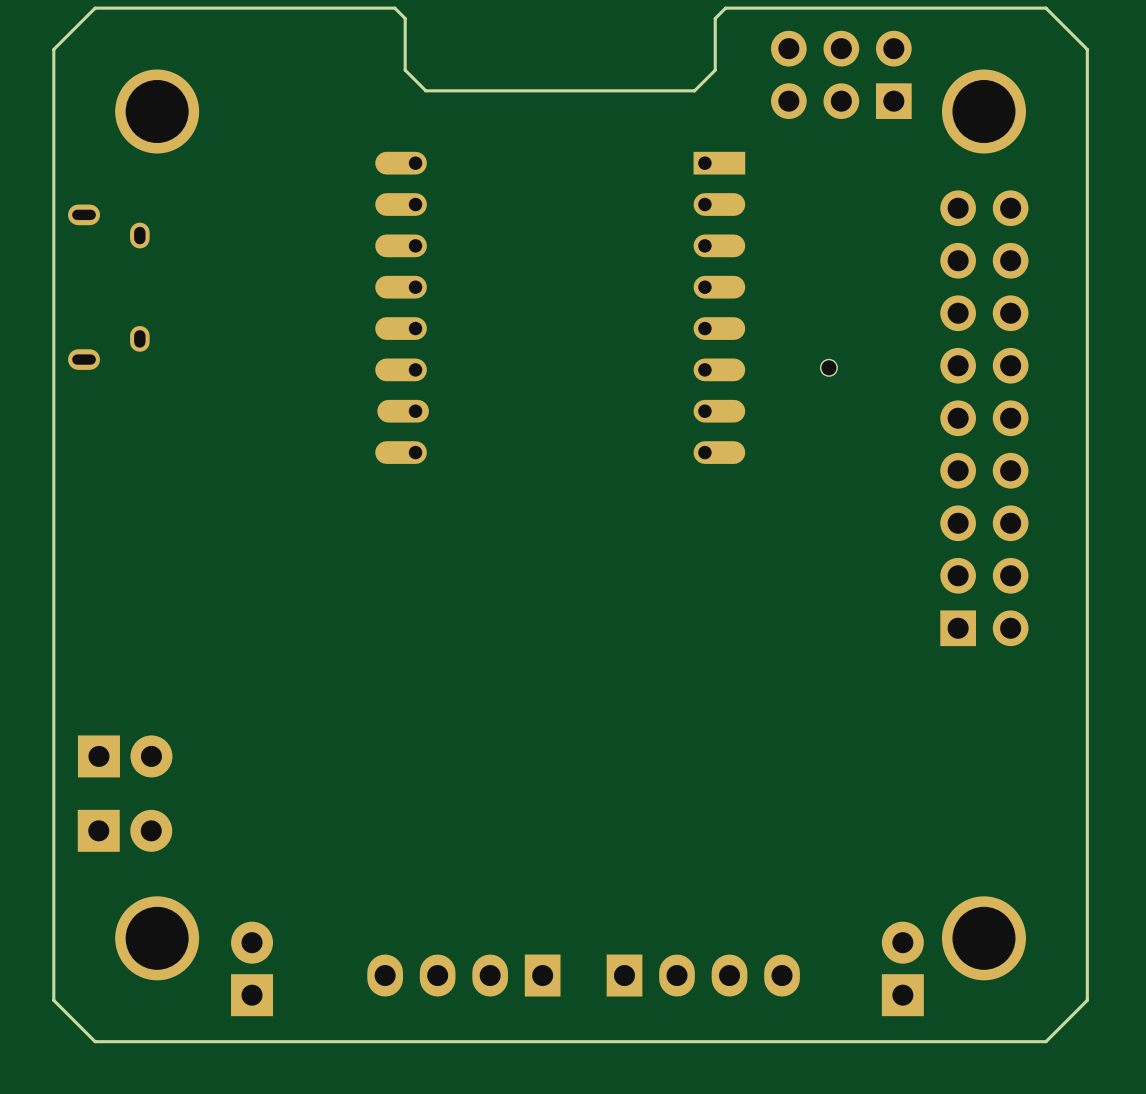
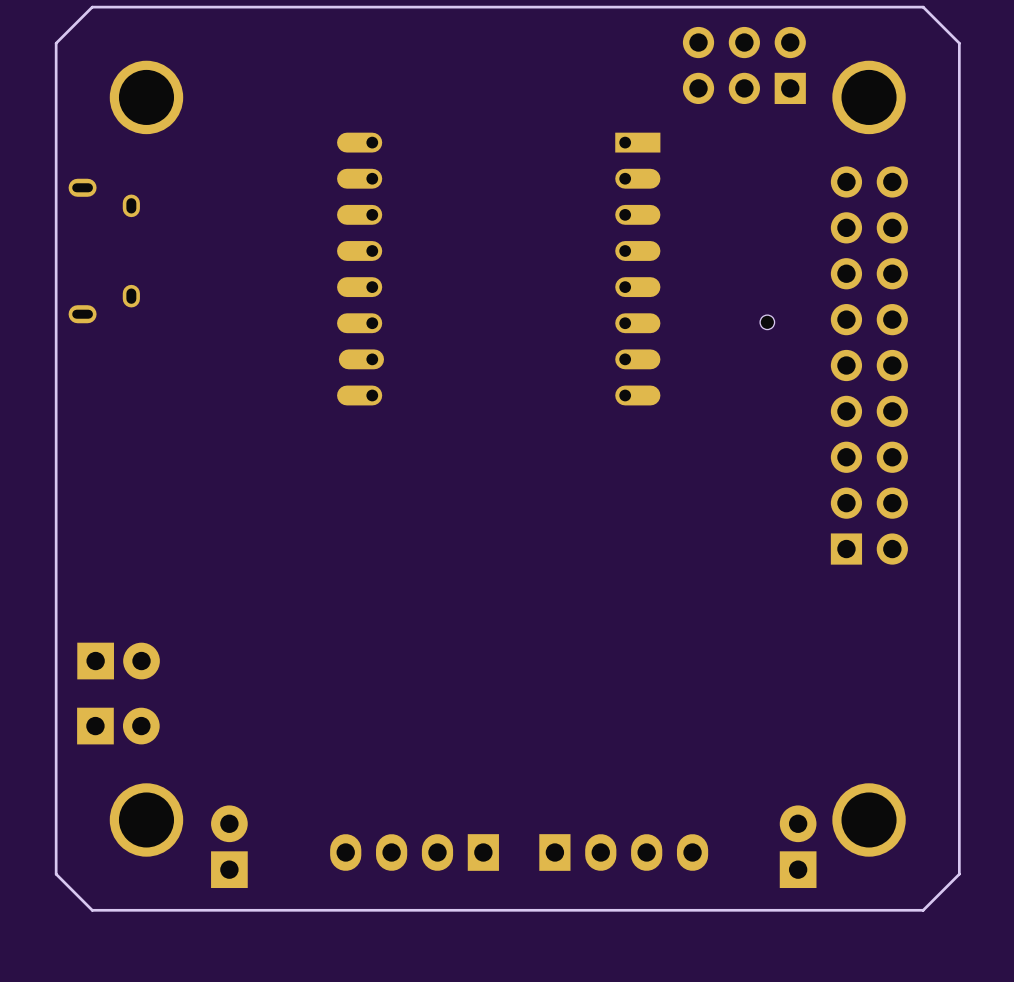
board edge: (725, 8) (715, 18) (715, 70) (694, 90) (425, 90) (405, 70) (405, 18) (394, 8) -> (643, 7) (354, 7)
part position: (828, 367) -> (767, 322)

